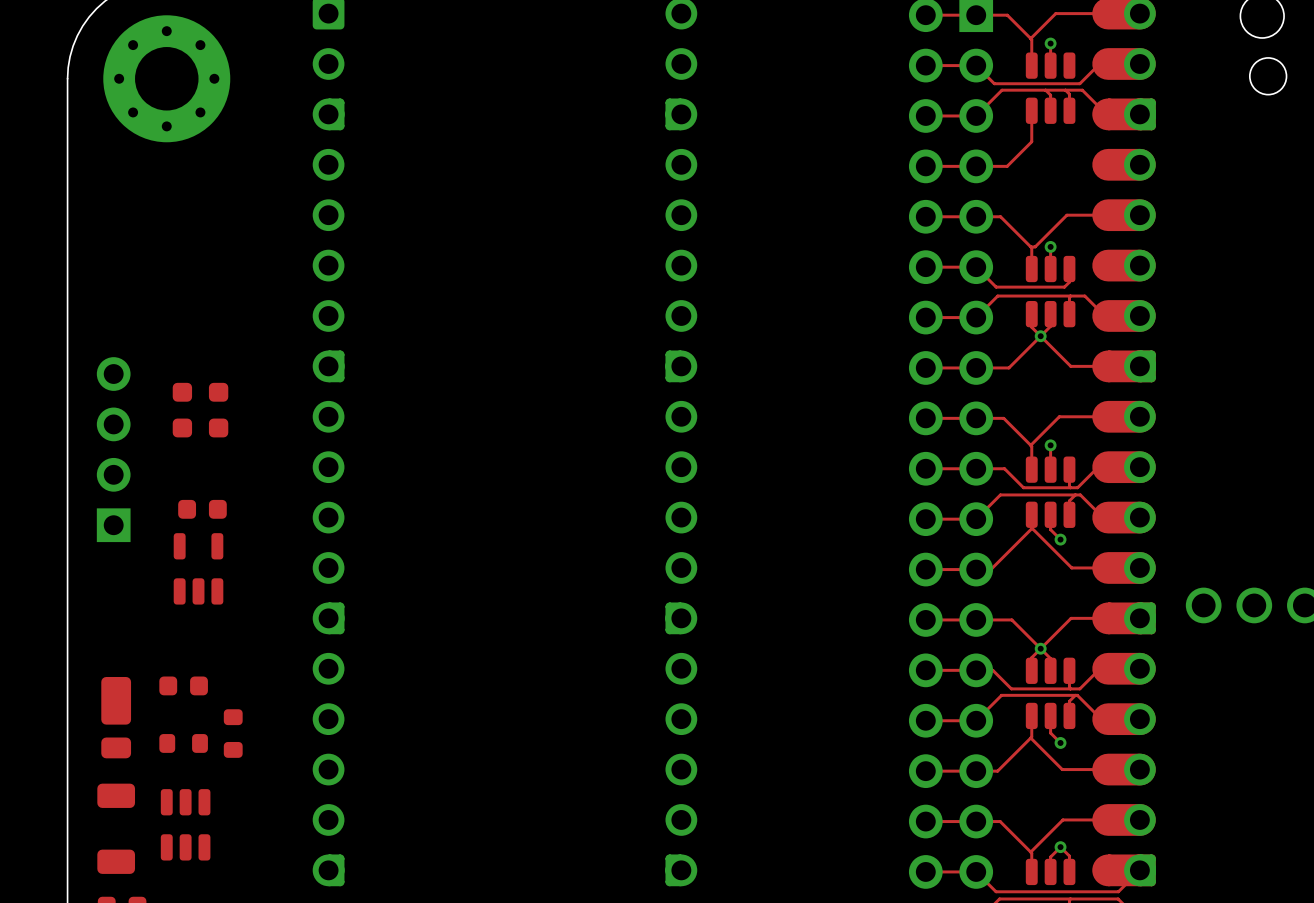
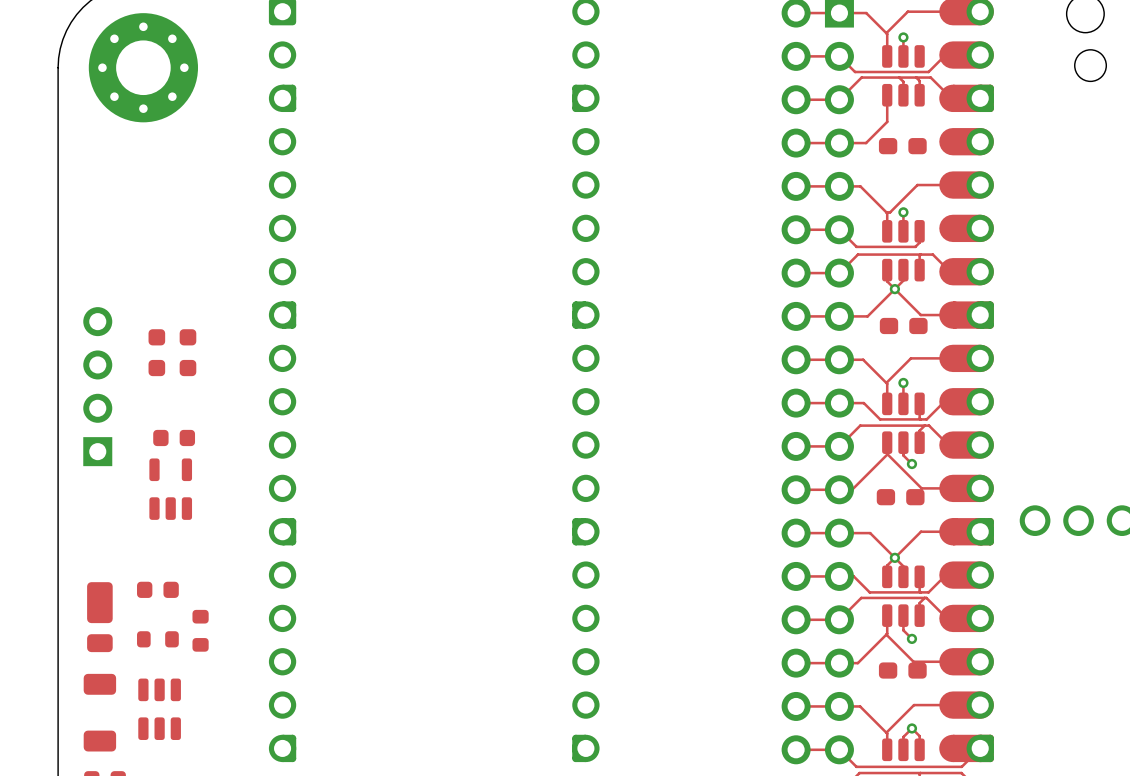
part: none -> (902, 146)
part: none -> (903, 325)
part: none -> (900, 497)
part: none -> (902, 670)

